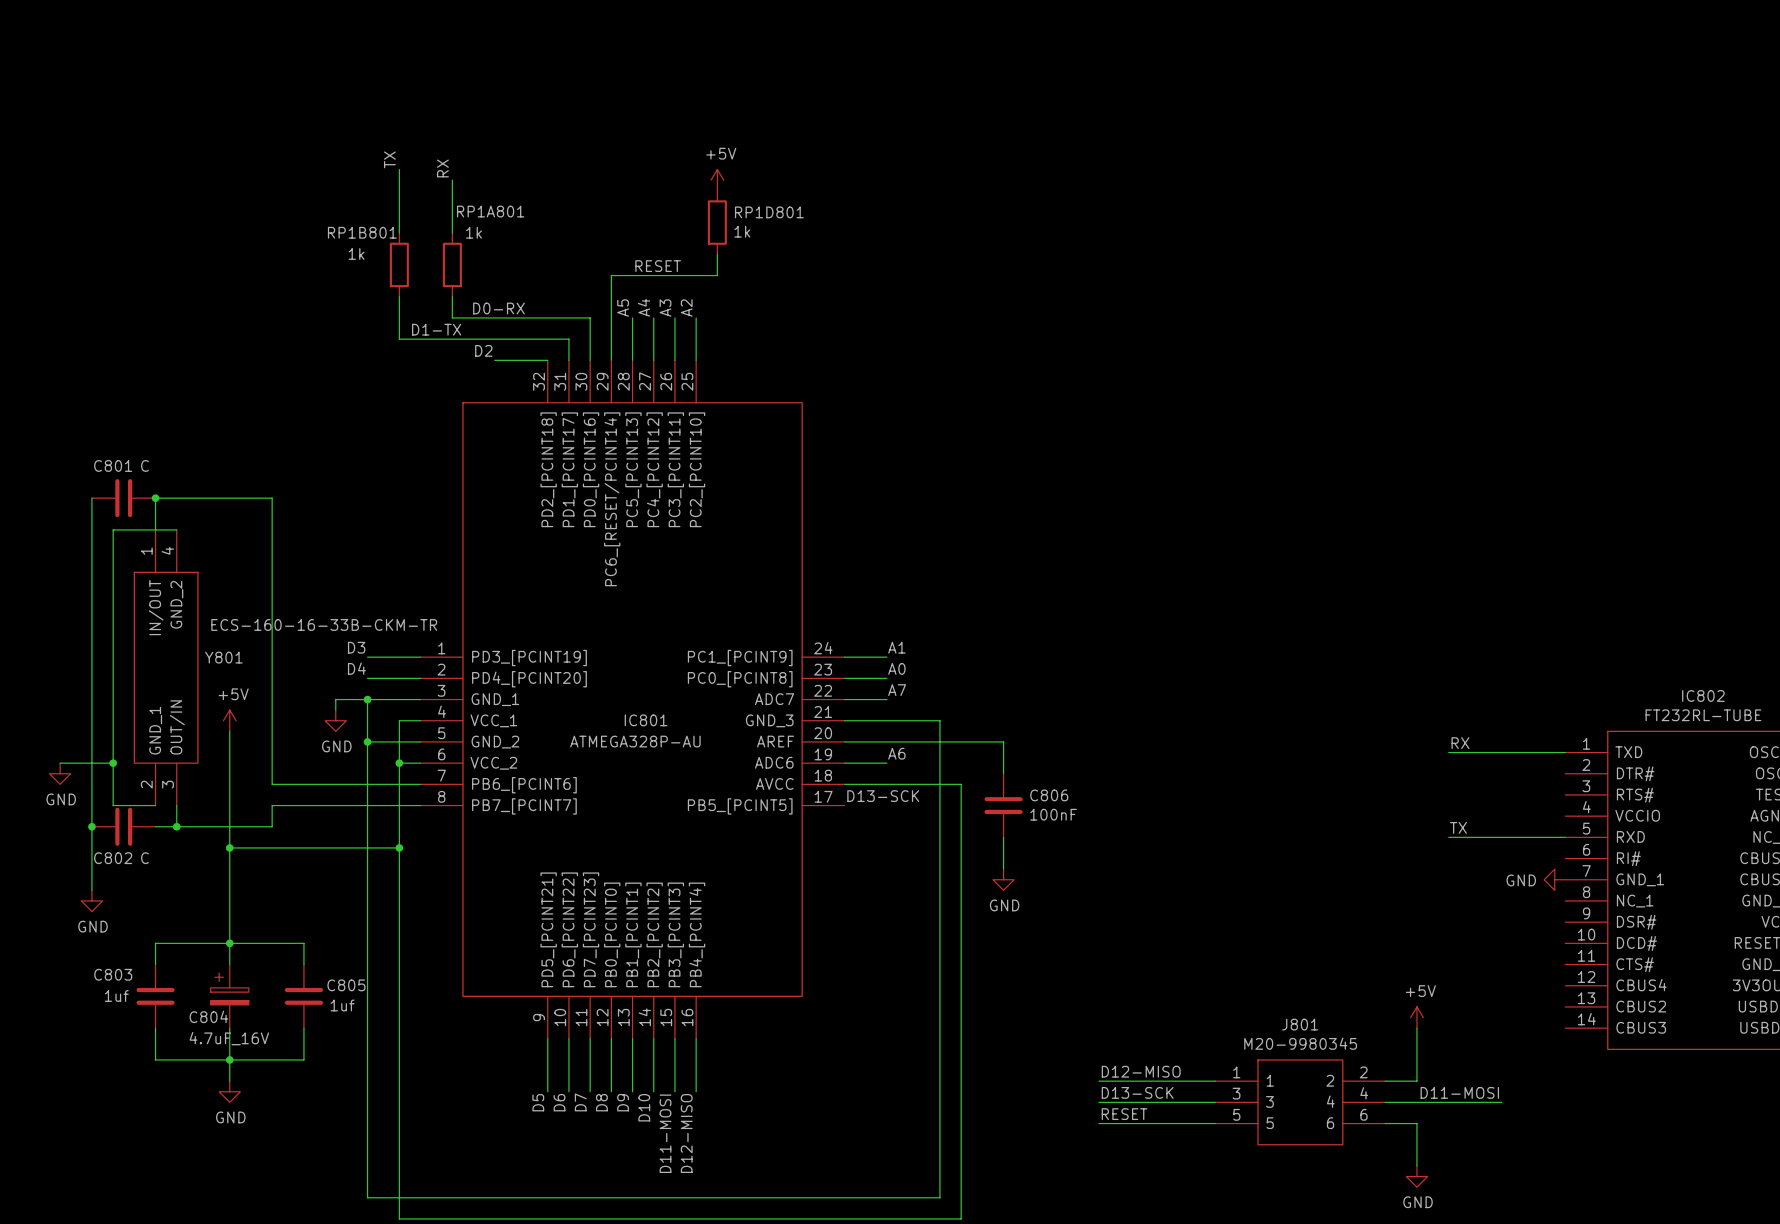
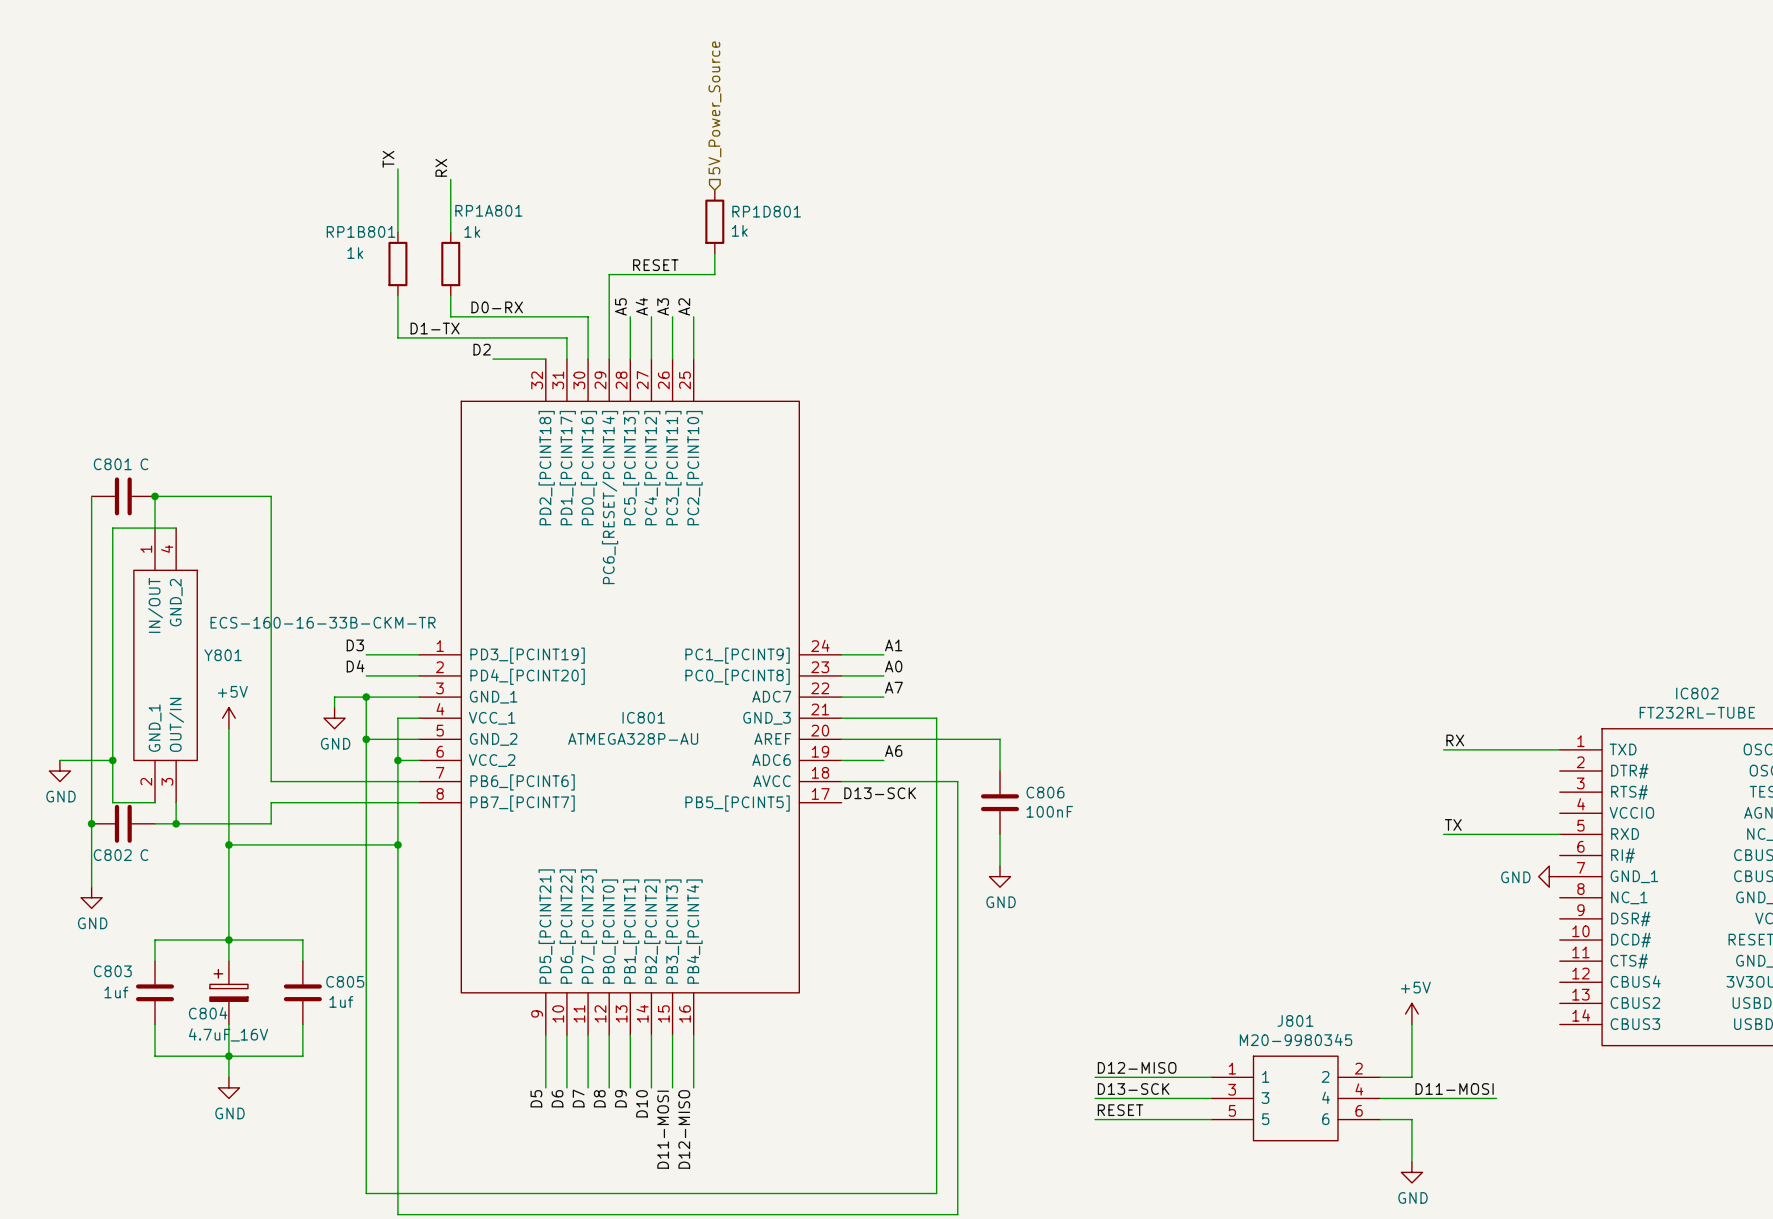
hierarchical label: none -> 5V_Power_Source (714, 107)
power symbol: +5V (717, 180) -> none

